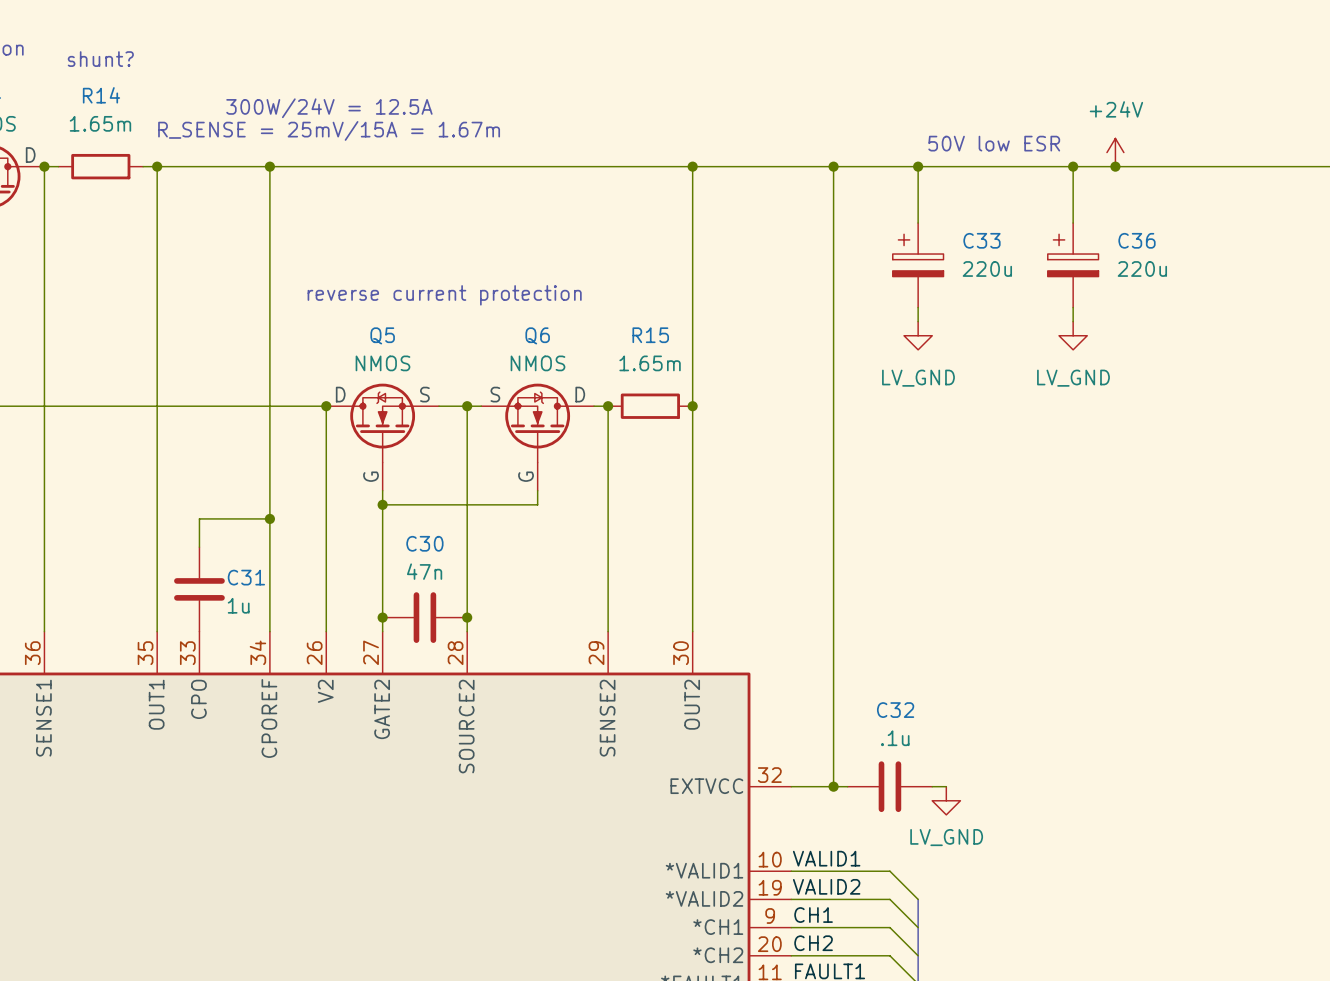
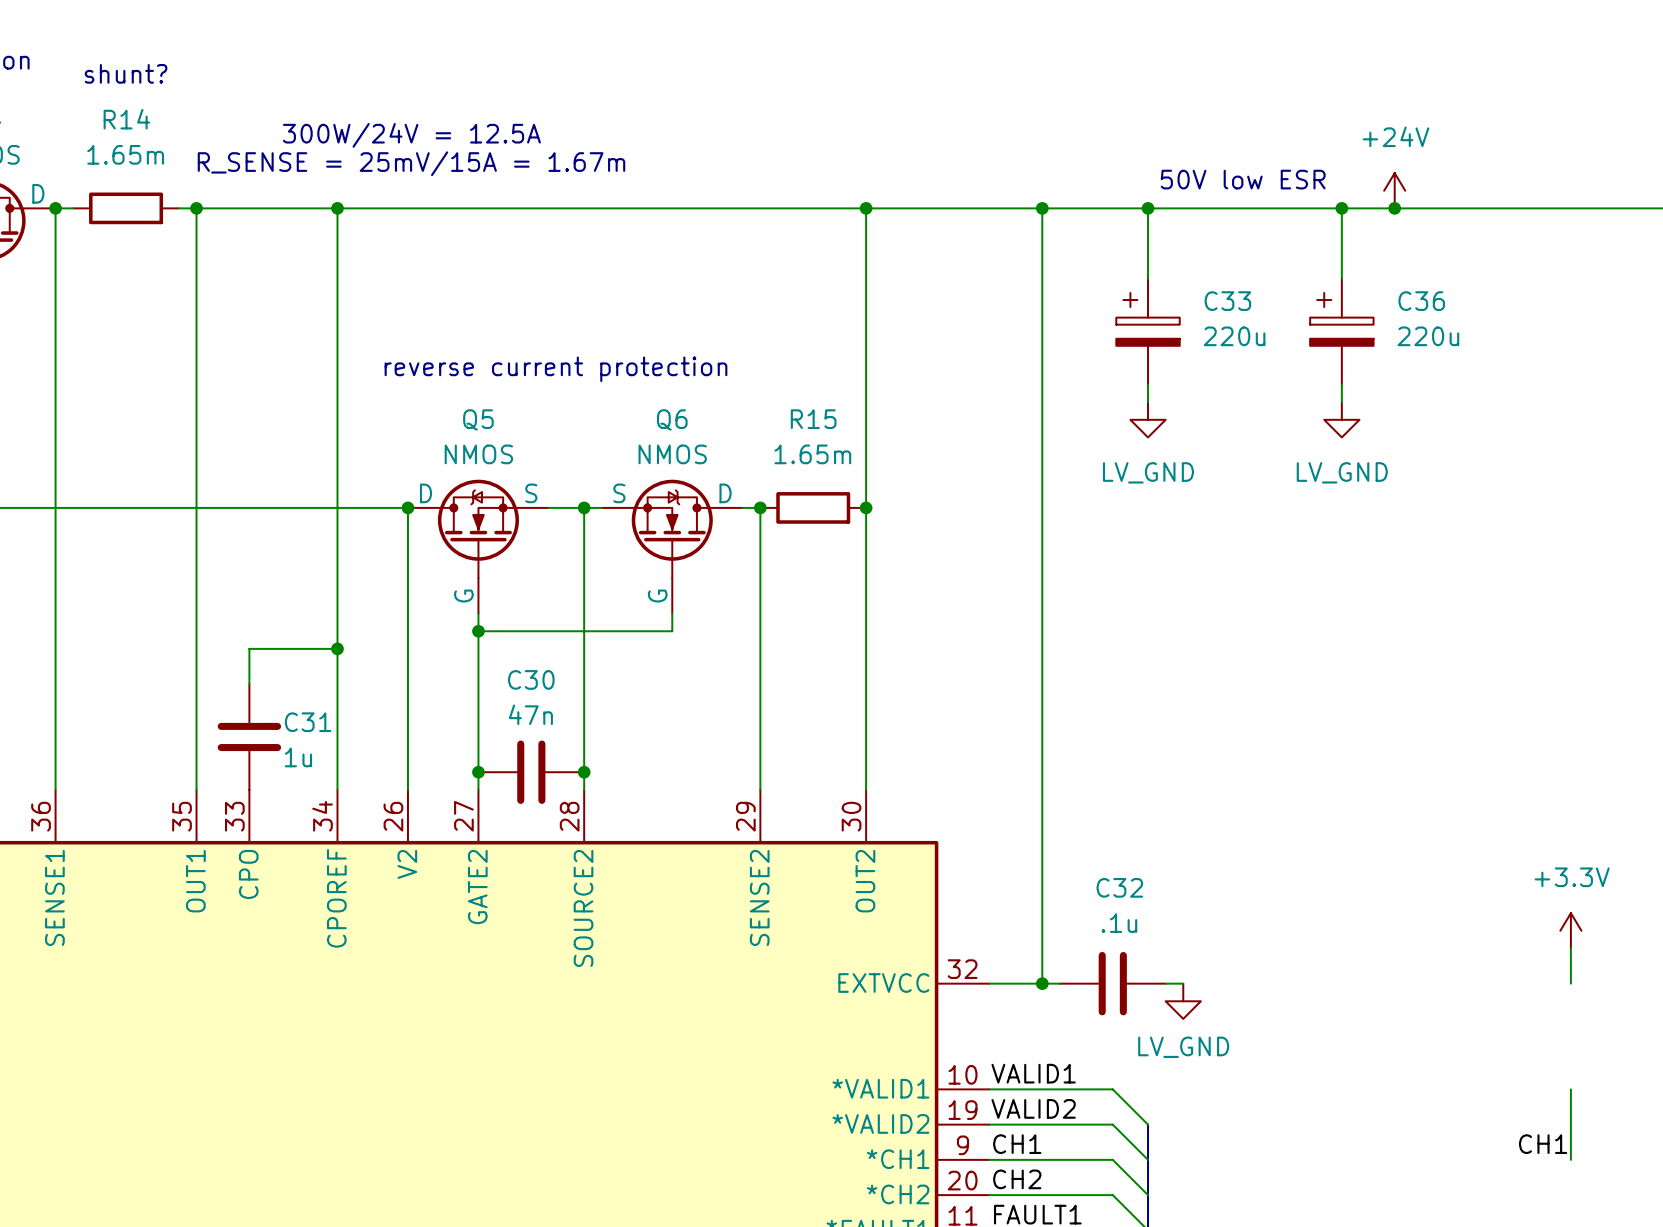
power symbol: none -> +3.3V (1570, 930)
wire: none -> (1570, 948) (1570, 983)
wire: none -> (1570, 1089) (1570, 1159)
label: none -> CH1 (1543, 1144)

